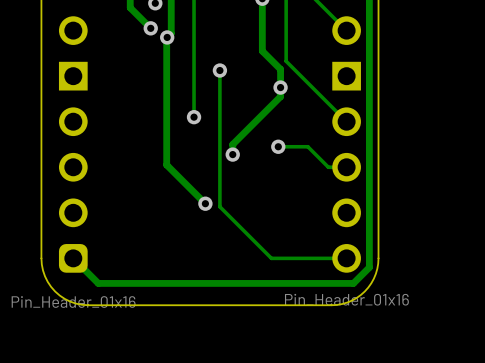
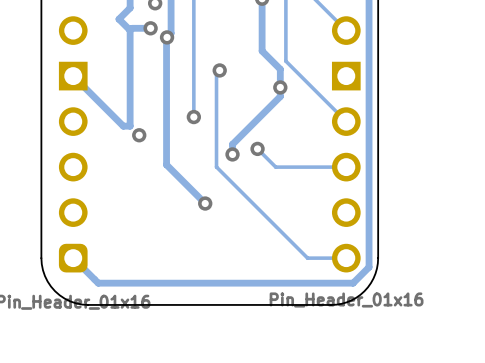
track: (130, 7) (150, 28) -> (130, 8) (118, 19) (130, 30)
track: none -> (150, 28) (132, 28) (130, 30)
track: none -> (130, 30) (130, 126) (123, 126) (73, 76)
track: (219, 70) (219, 206) (271, 258) (307, 258) -> (216, 67) (216, 167) (307, 258)
via: none -> (139, 135)
track: (278, 146) (307, 146) (328, 167) -> (257, 148) (275, 167) (328, 167)
via position: (278, 146) -> (257, 148)

